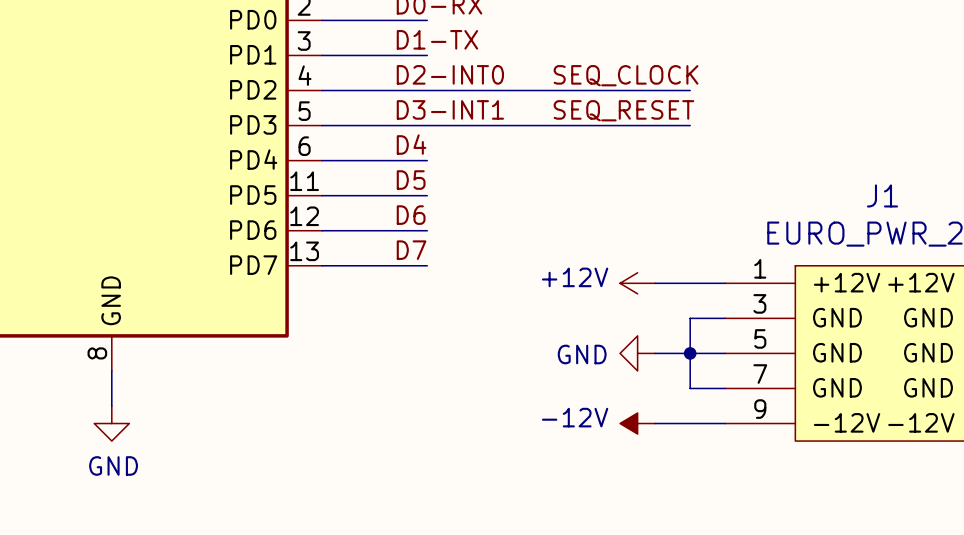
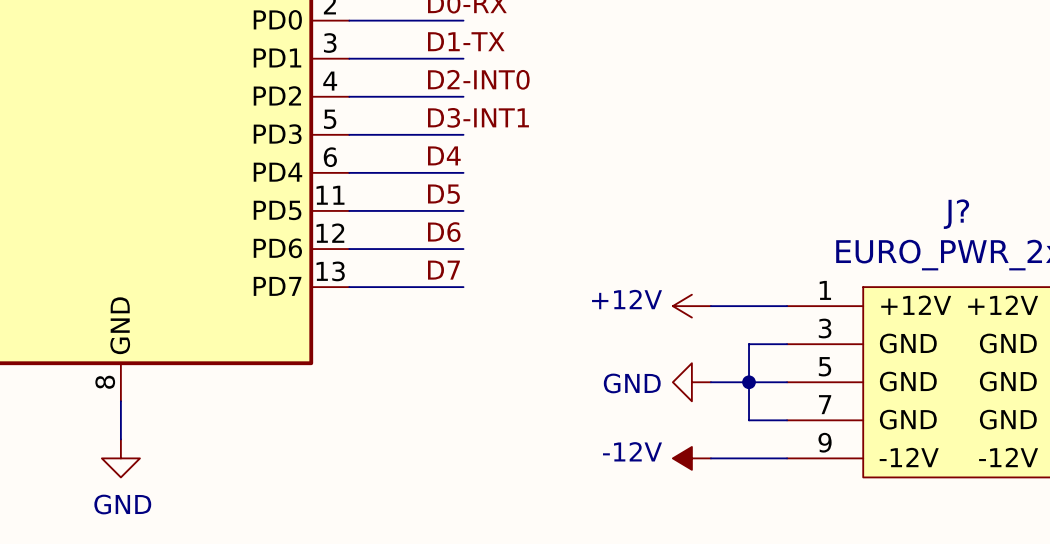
label: SEQ_CLOCK (626, 75) -> none
wire: (427, 90) (690, 90) -> none
label: SEQ_RESET (623, 110) -> none
wire: (427, 125) (690, 125) -> none
J1 name: J1 (882, 195) -> J? (956, 214)

